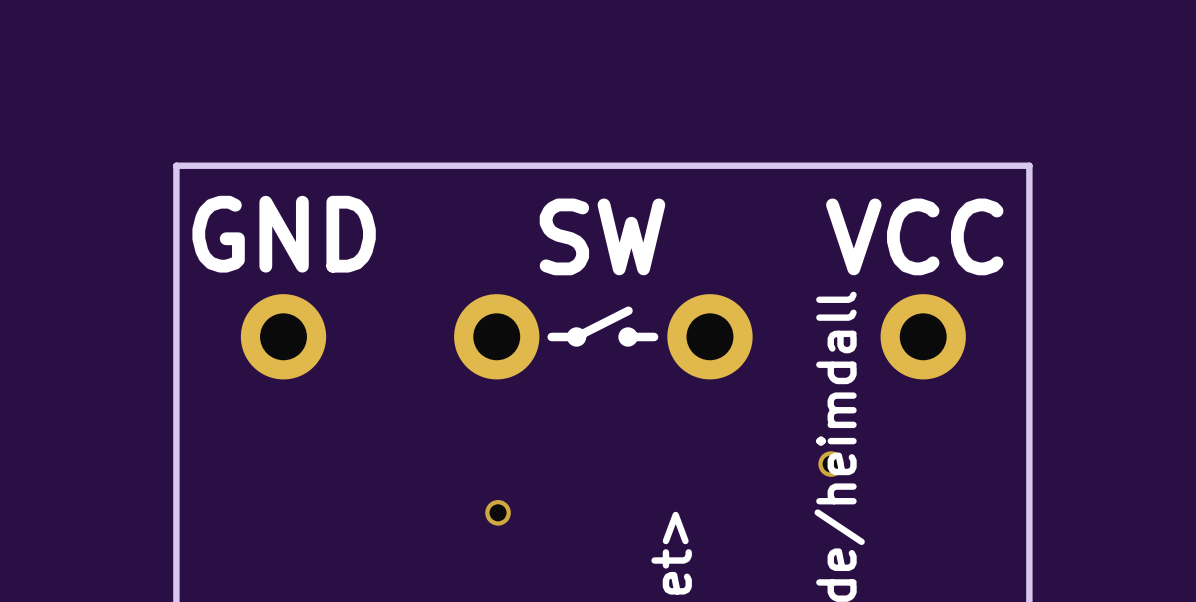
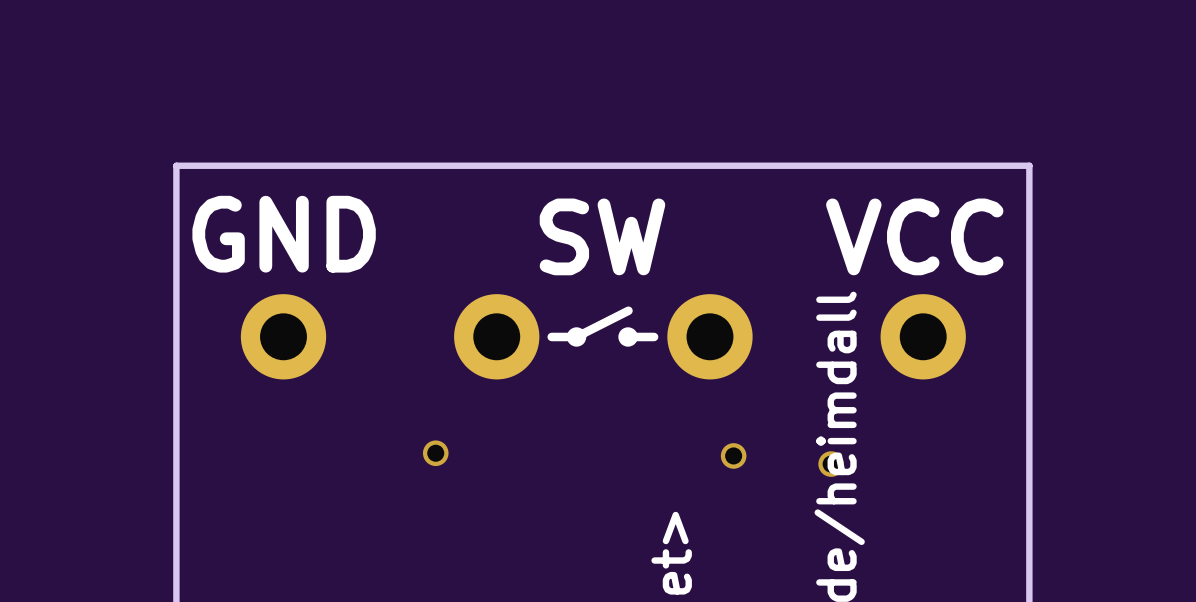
via: none -> (733, 455)
via position: (498, 512) -> (435, 453)

